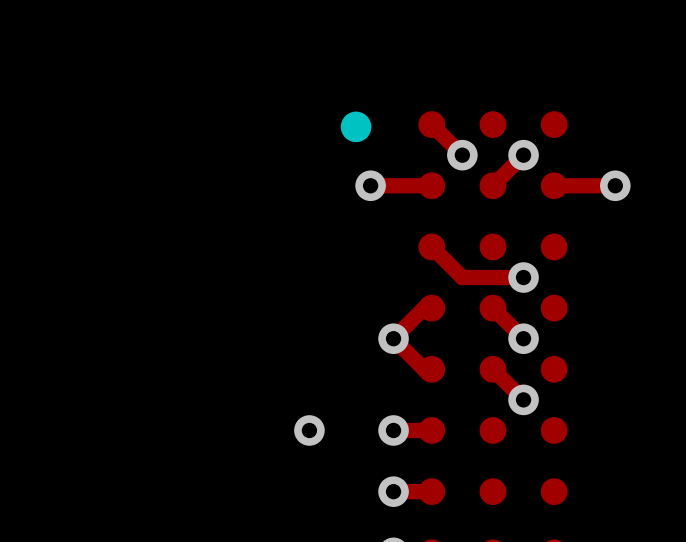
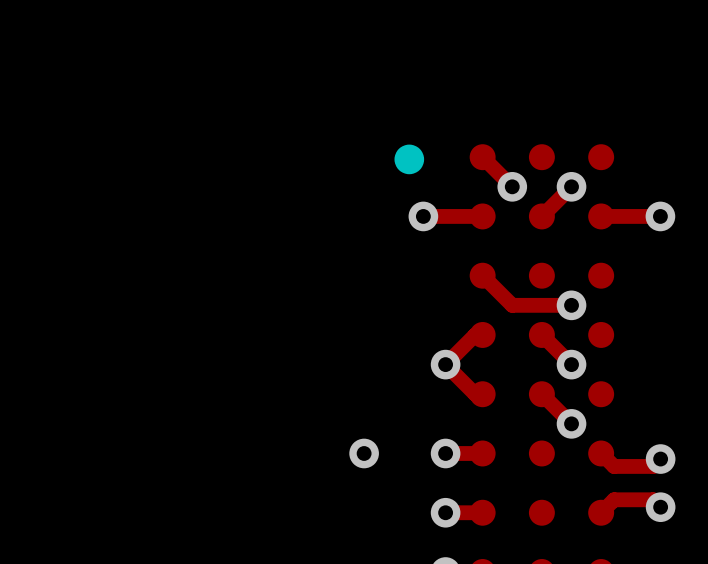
track: none -> (601, 453) (614, 466) (653, 466) (660, 459)
via: none -> (660, 459)
track: none -> (660, 507) (653, 499) (614, 499) (601, 512)
via: none -> (660, 507)

